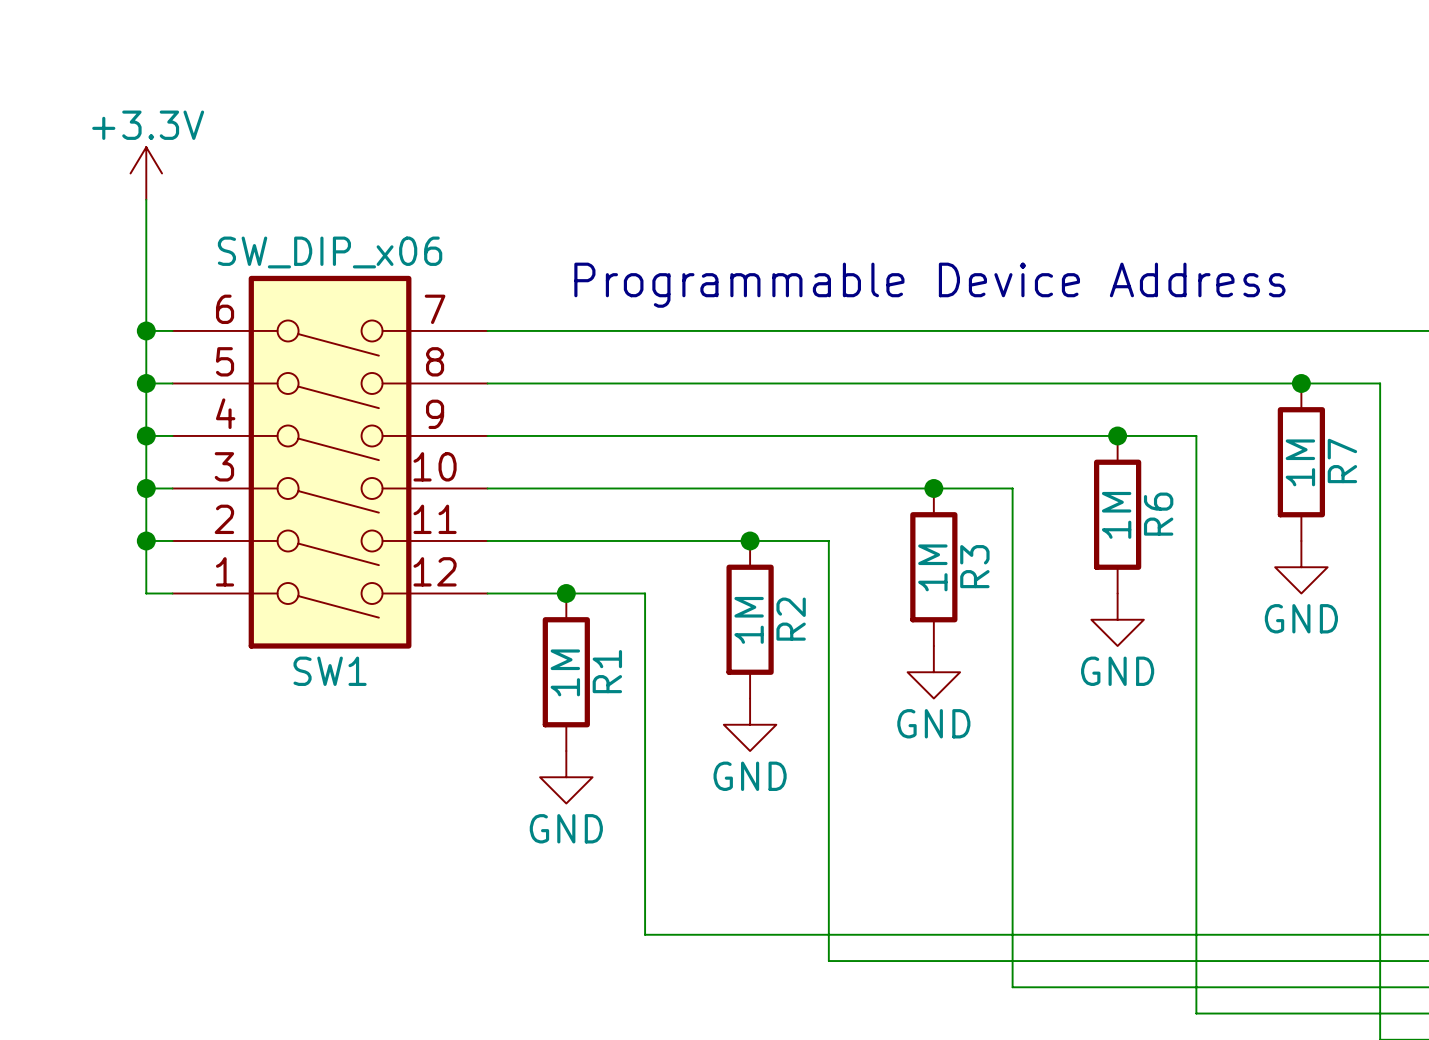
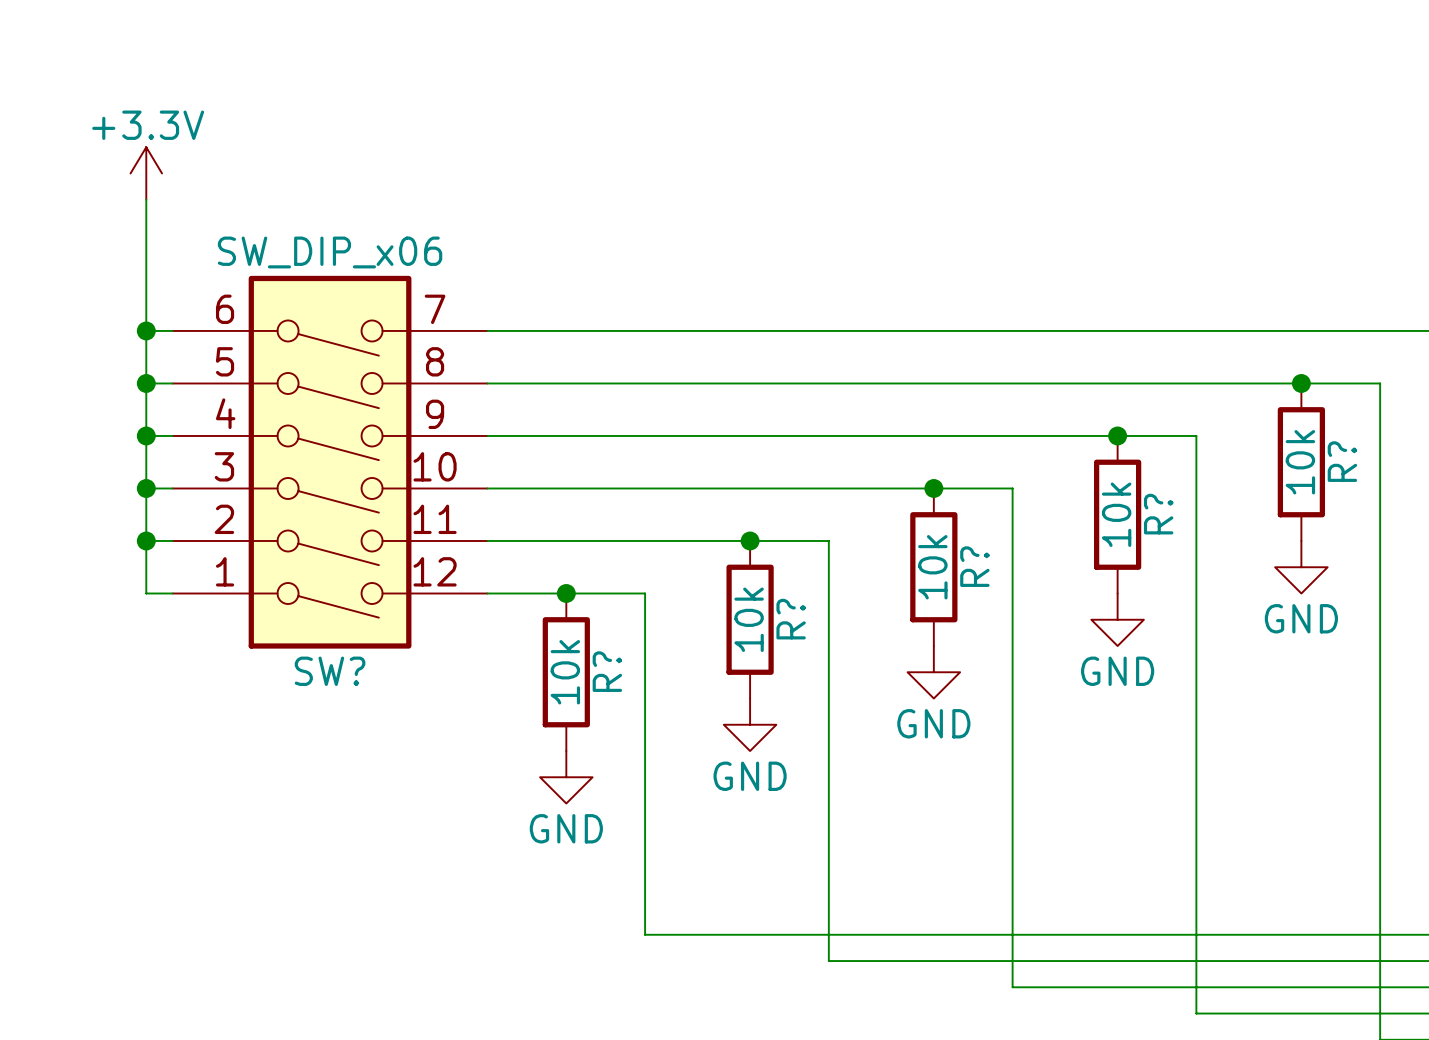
text: Programmable Device Address (929, 285) -> none
R7 name: R7 (1342, 460) -> R? (1342, 461)
R7 value: 1M (1300, 462) -> 10k (1300, 462)
R6 name: R6 (1158, 514) -> R? (1158, 514)
R6 value: 1M (1116, 515) -> 10k (1116, 514)
R3 name: R3 (974, 566) -> R? (974, 566)
R3 value: 1M (932, 567) -> 10k (932, 567)
R2 name: R2 (791, 619) -> R? (791, 619)
R2 value: 1M (749, 620) -> 10k (749, 619)
SW1 name: SW1 (330, 671) -> SW? (330, 671)
R1 name: R1 (607, 671) -> R? (607, 671)
R1 value: 1M (565, 672) -> 10k (565, 672)

